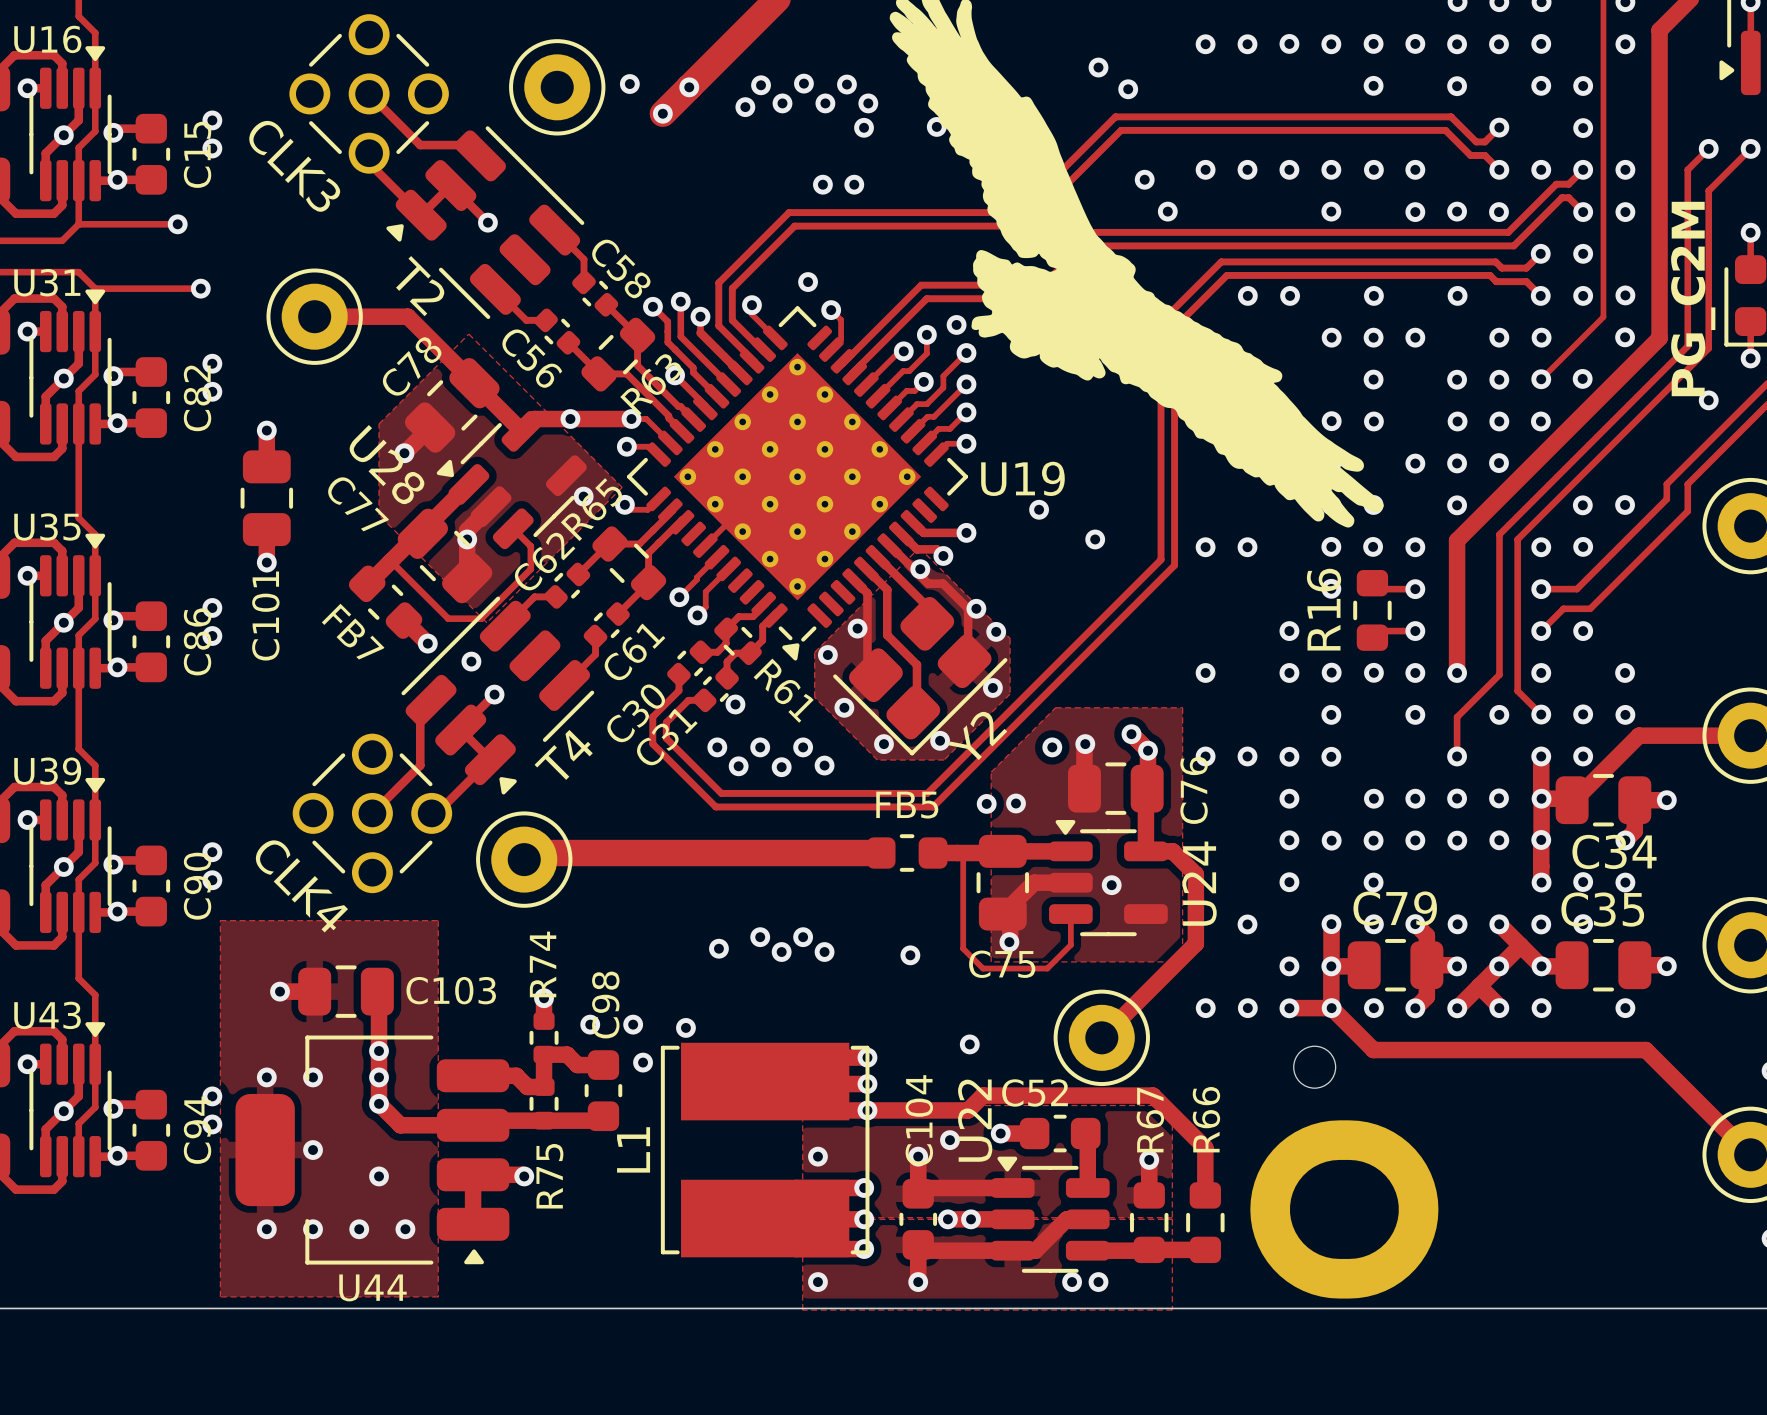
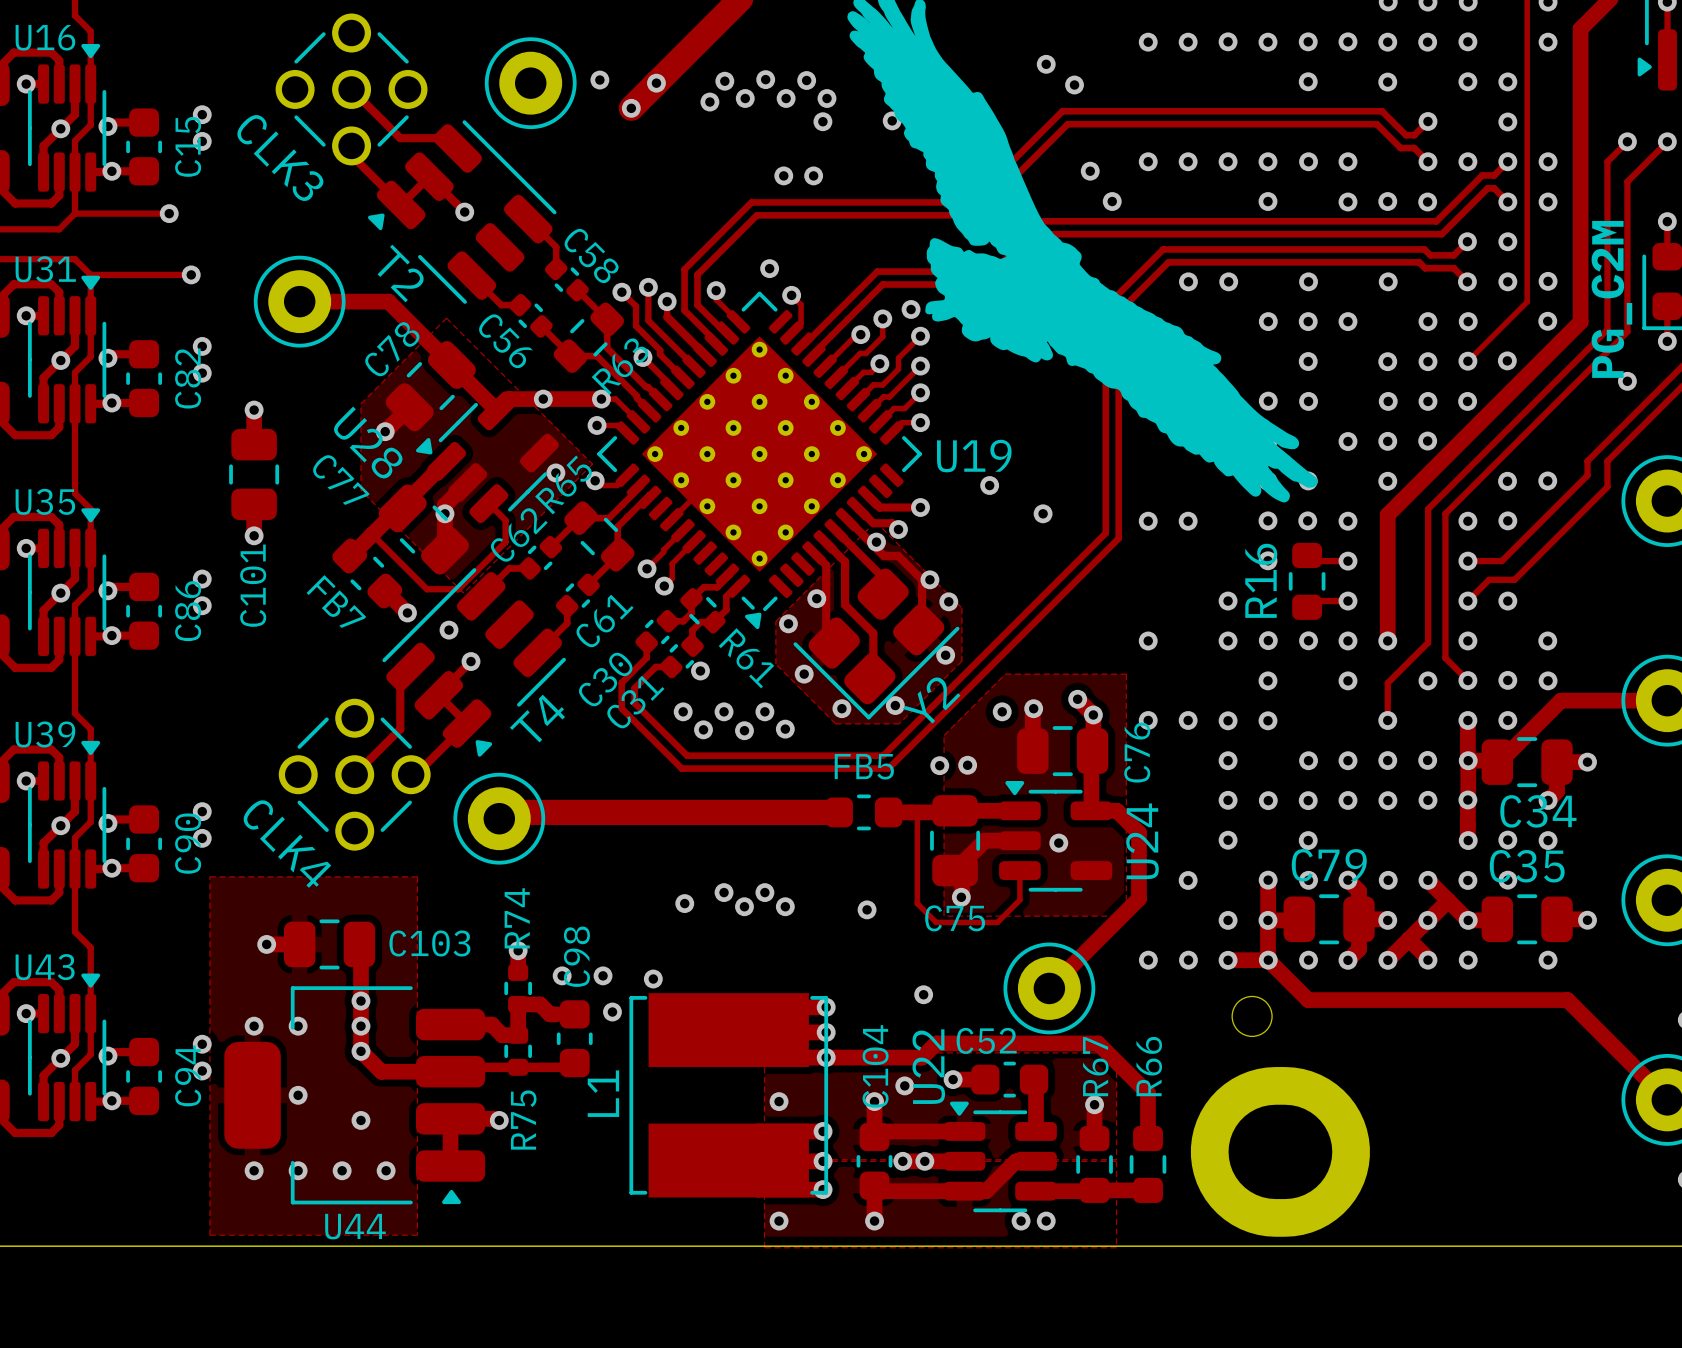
track width: thick (603, 1116) (598, 1120) (477, 1120) (473, 1125) -> thin (574, 1063) (570, 1067) (454, 1067) (450, 1071)

